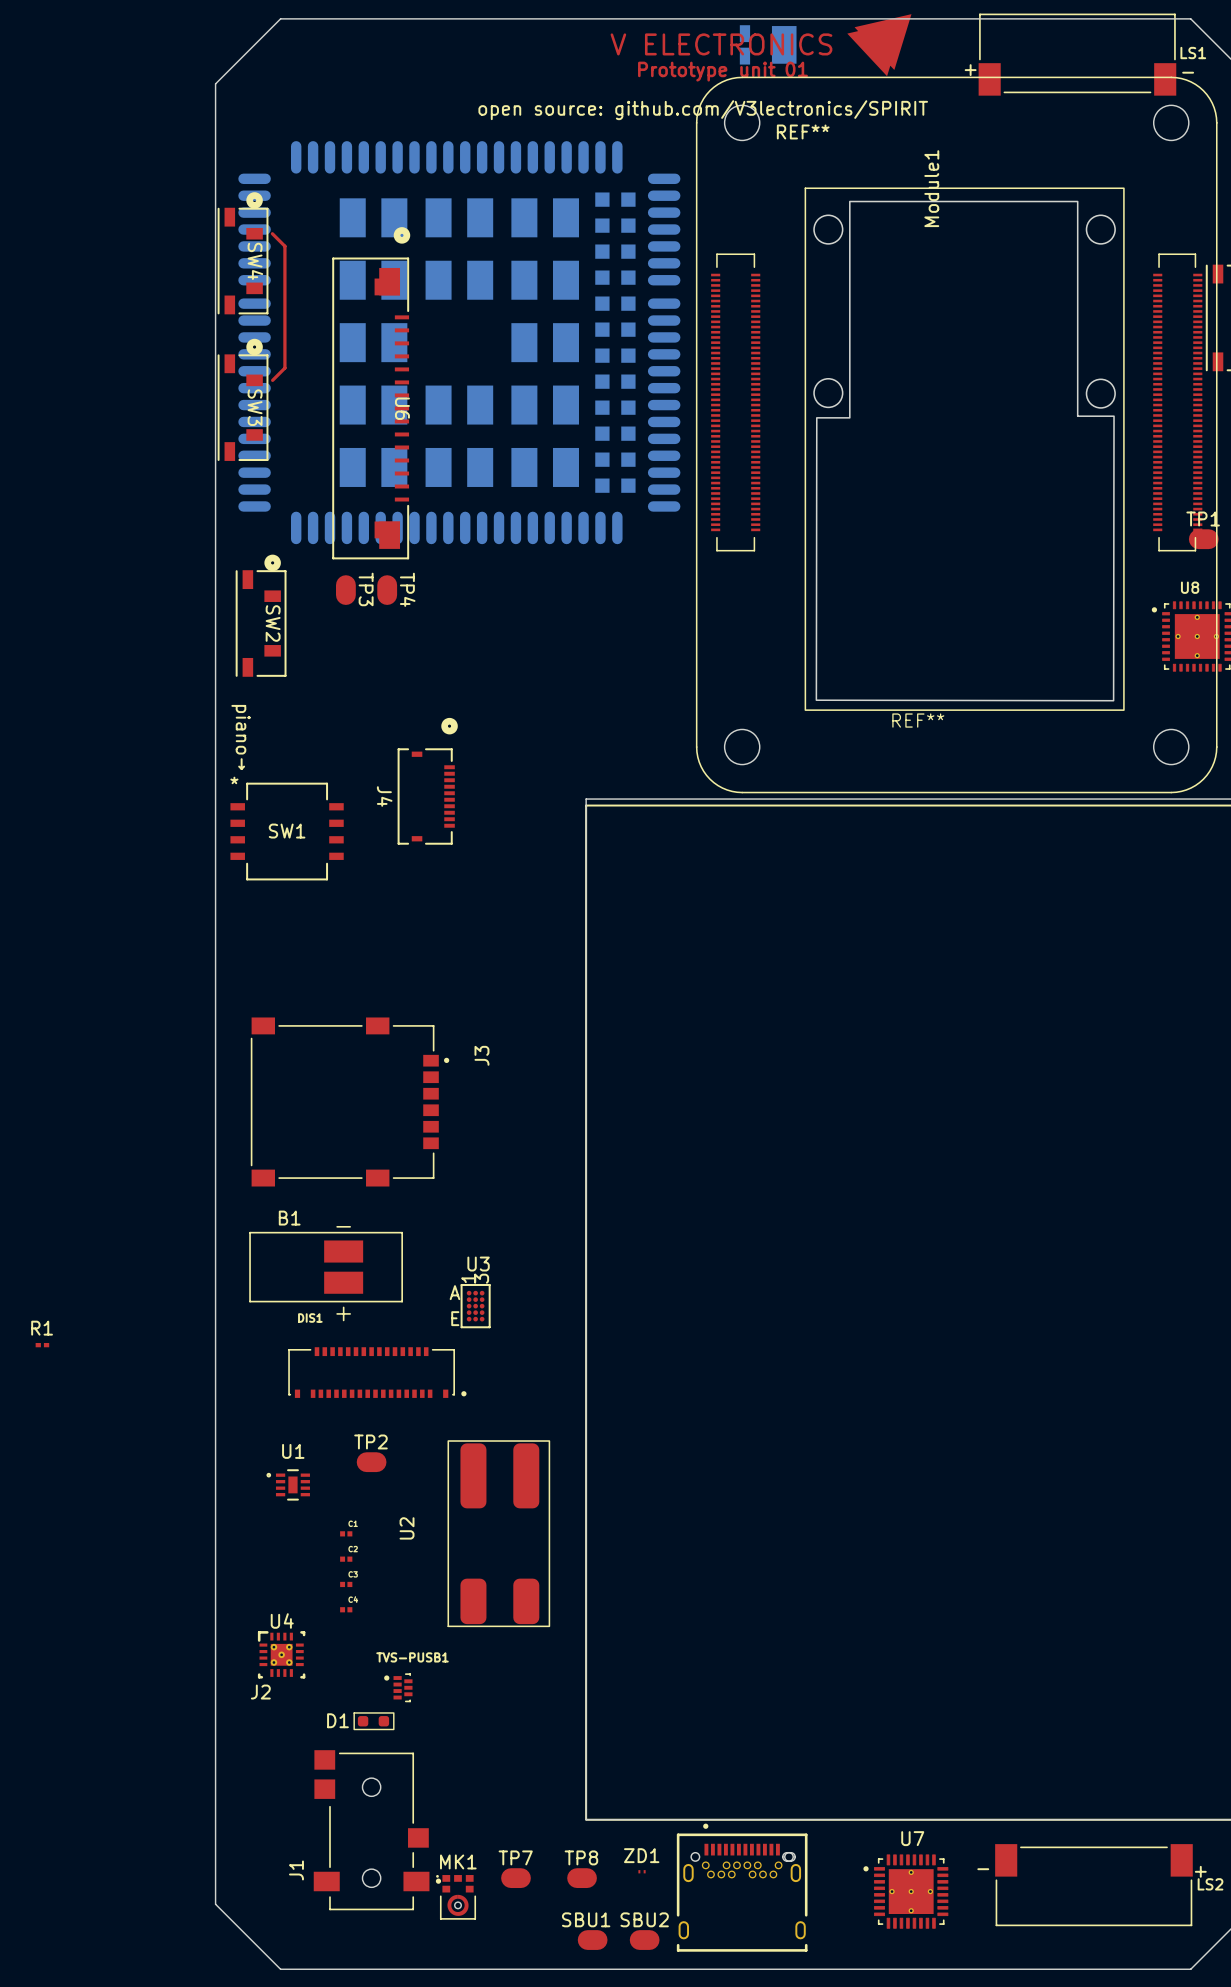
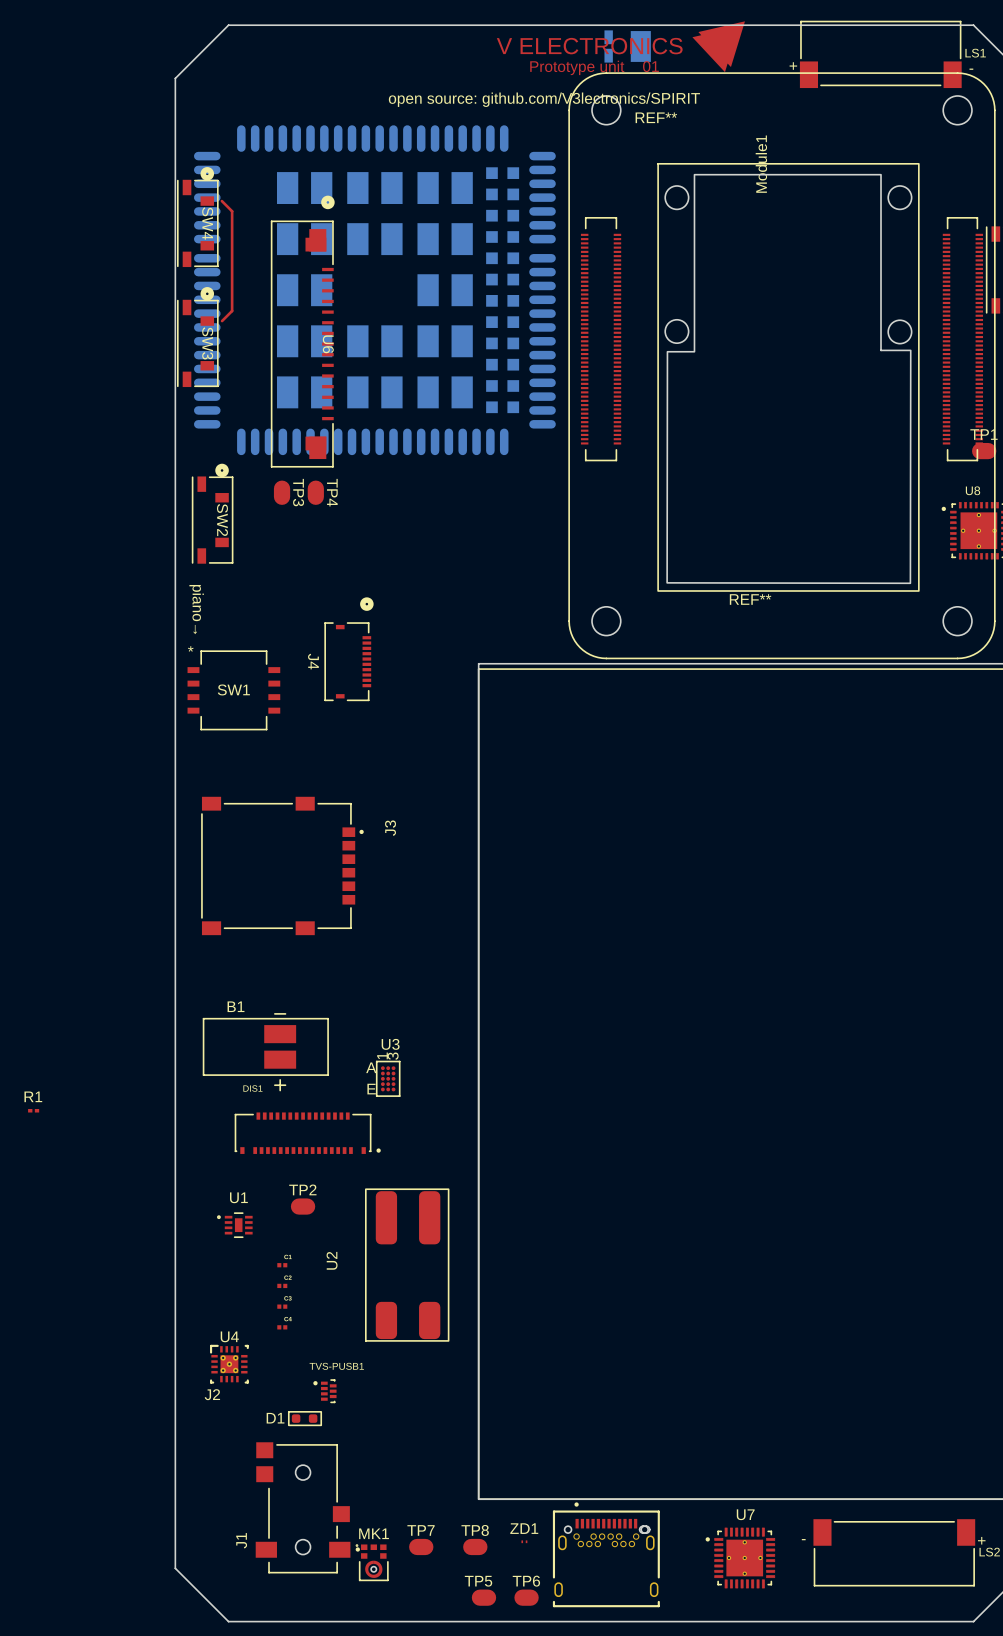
J3 position: (349, 1101) -> (282, 865)
SBU1 name: SBU1 (586, 1919) -> TP5 (478, 1581)
SBU2 name: SBU2 (644, 1919) -> TP6 (526, 1581)

